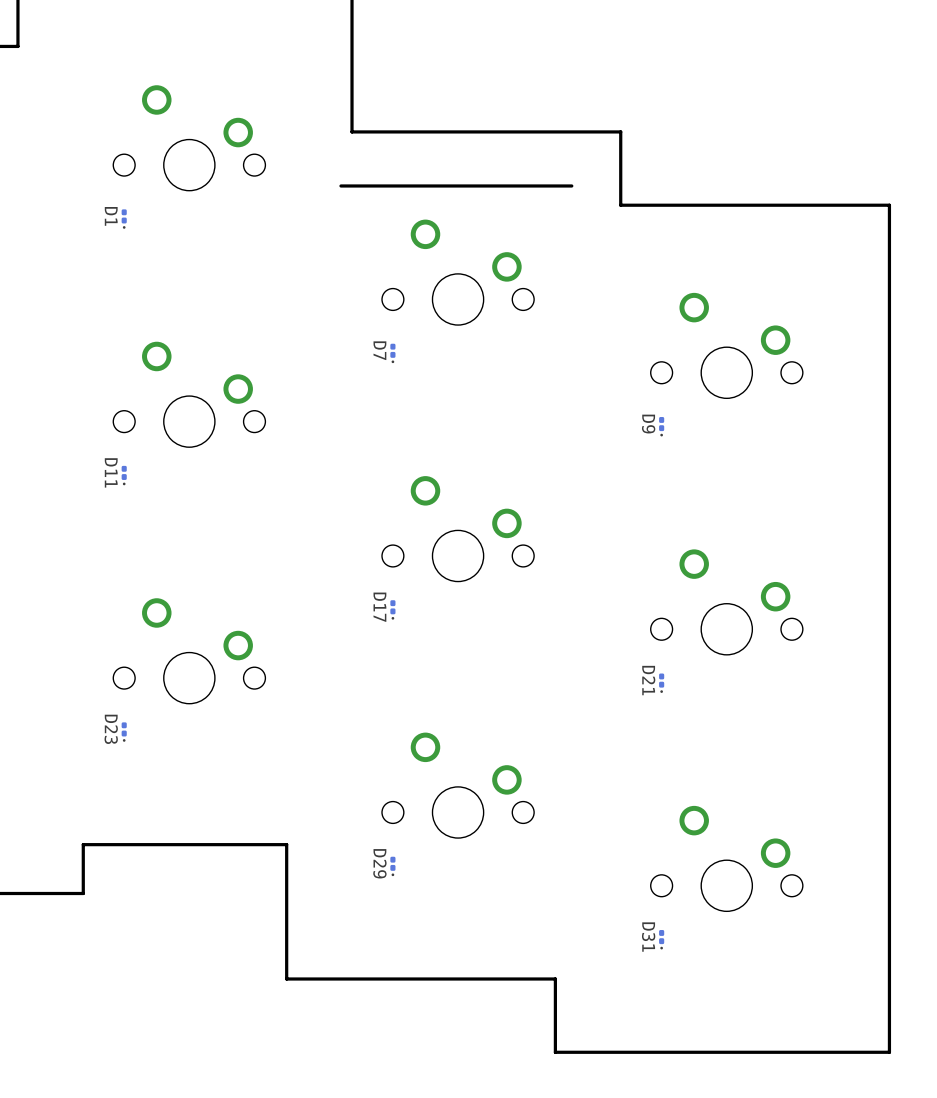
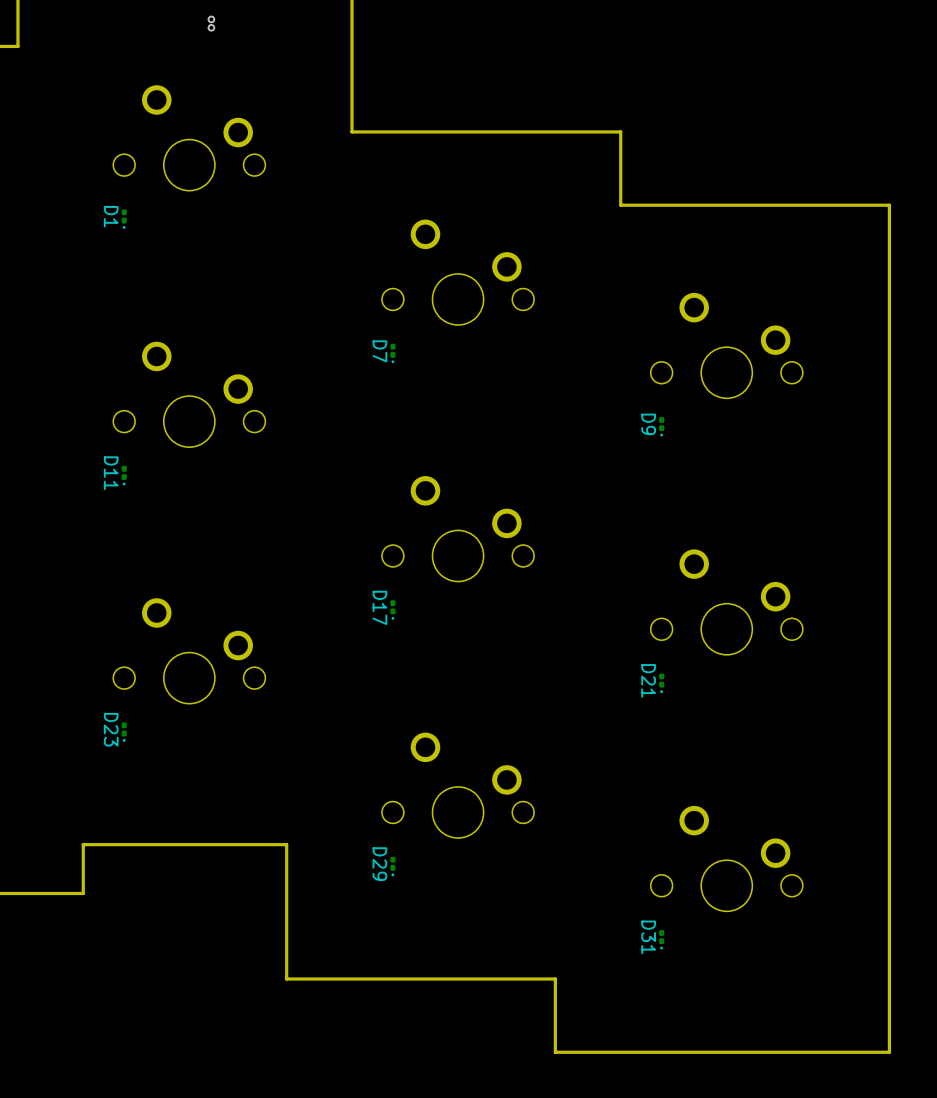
via: none -> (211, 19)
via: none -> (211, 27)
board edge: (571, 185) (340, 185) -> none

